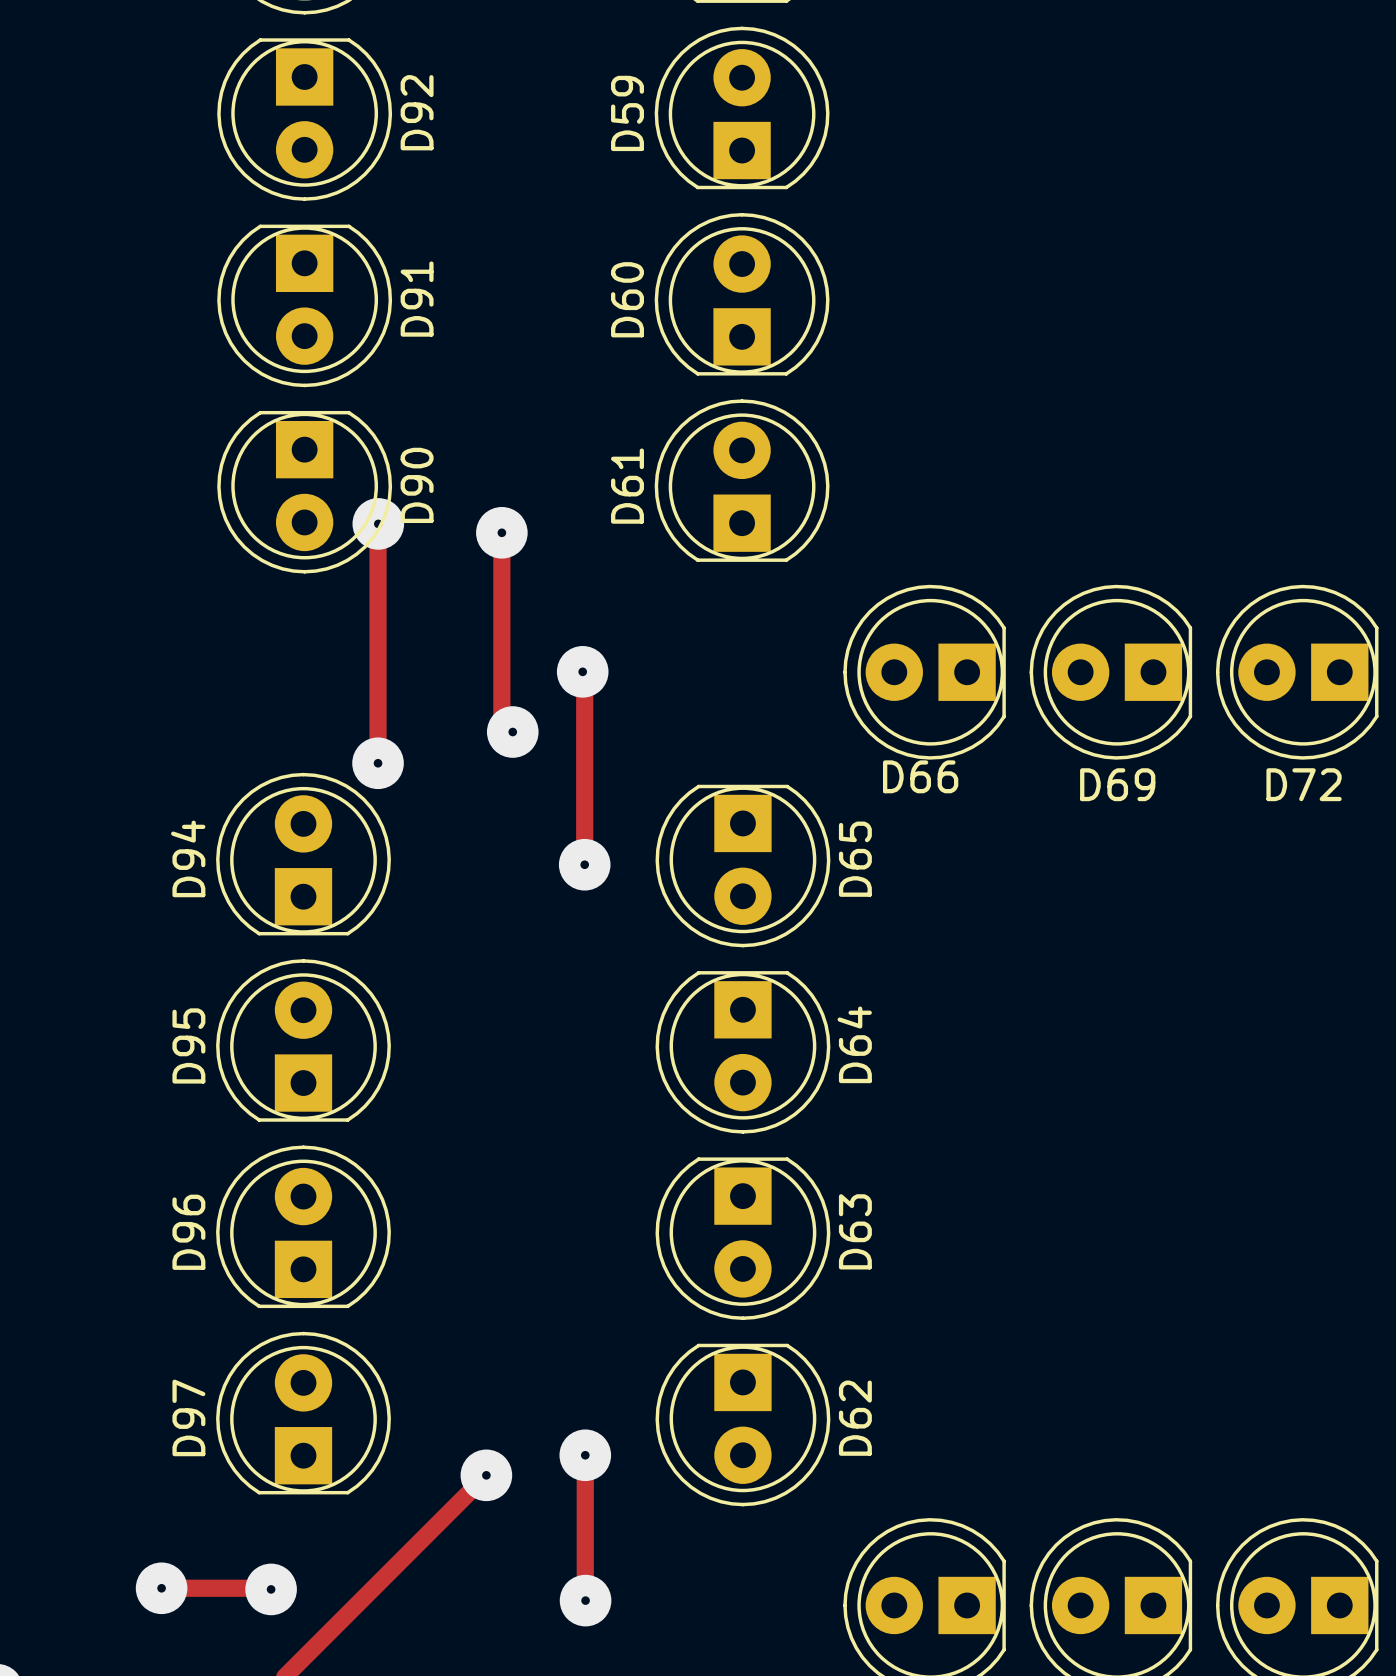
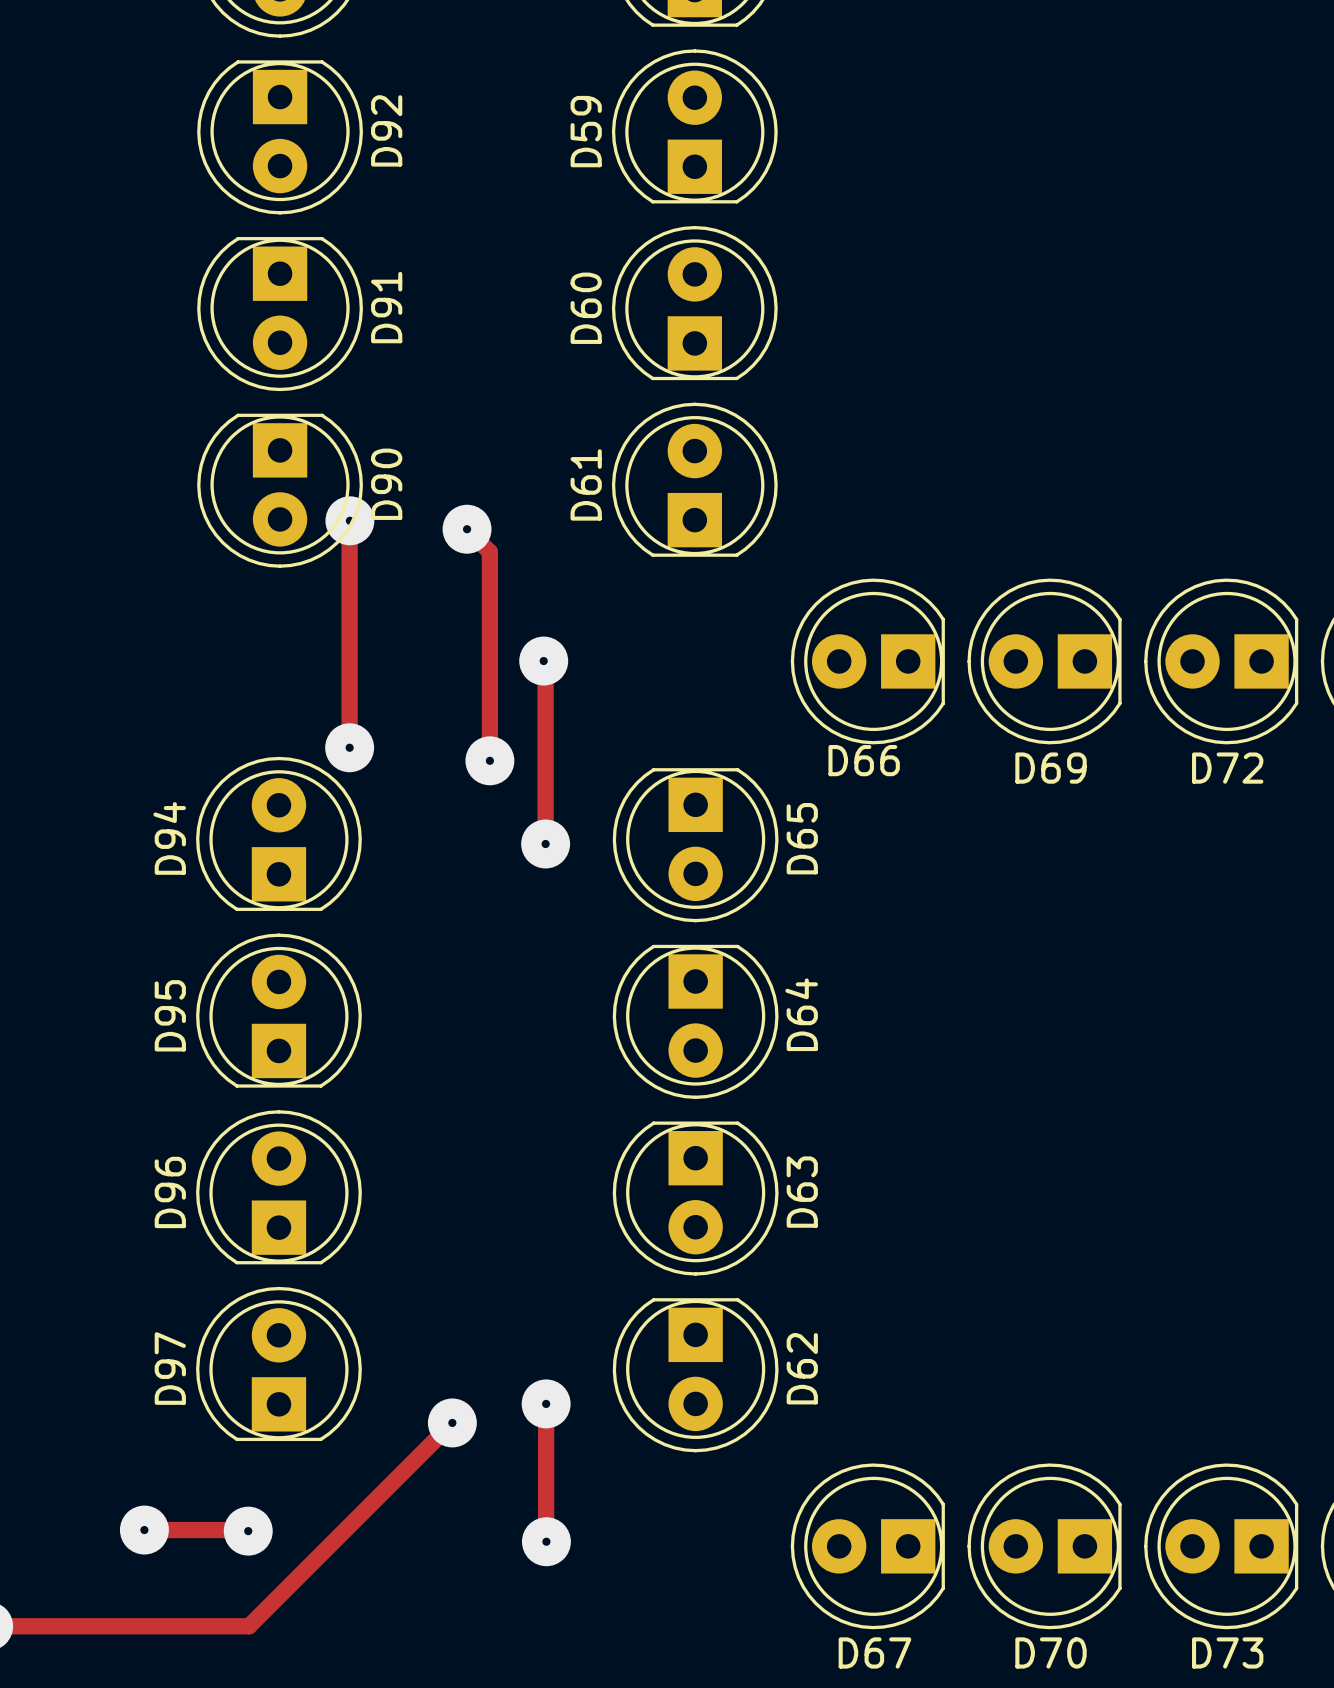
track: (501, 532) (501, 721) (512, 732) -> (467, 529) (489, 552) (489, 760)
via position: (512, 732) -> (489, 760)

